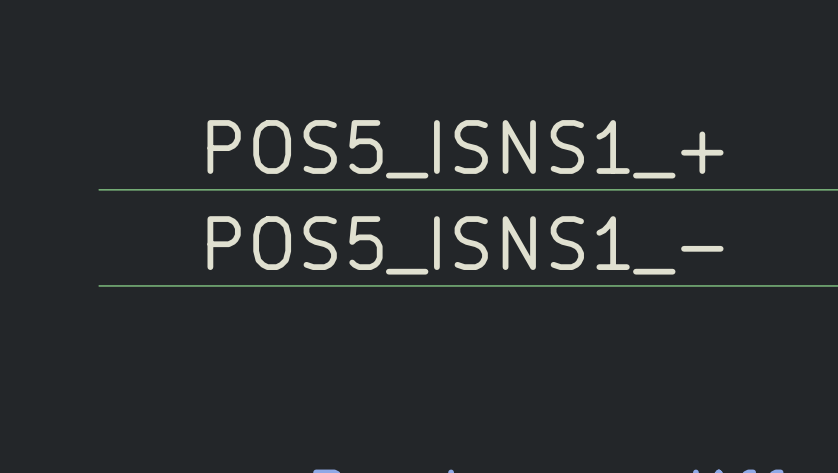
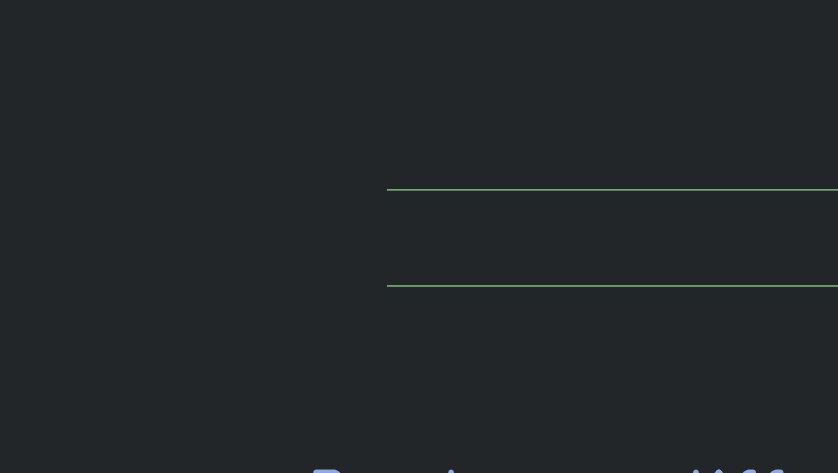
label: POS5_ISNS1_+ (465, 149) -> none
wire: (99, 189) (387, 189) -> none
label: POS5_ISNS1_- (465, 245) -> none
wire: (99, 285) (387, 285) -> none

